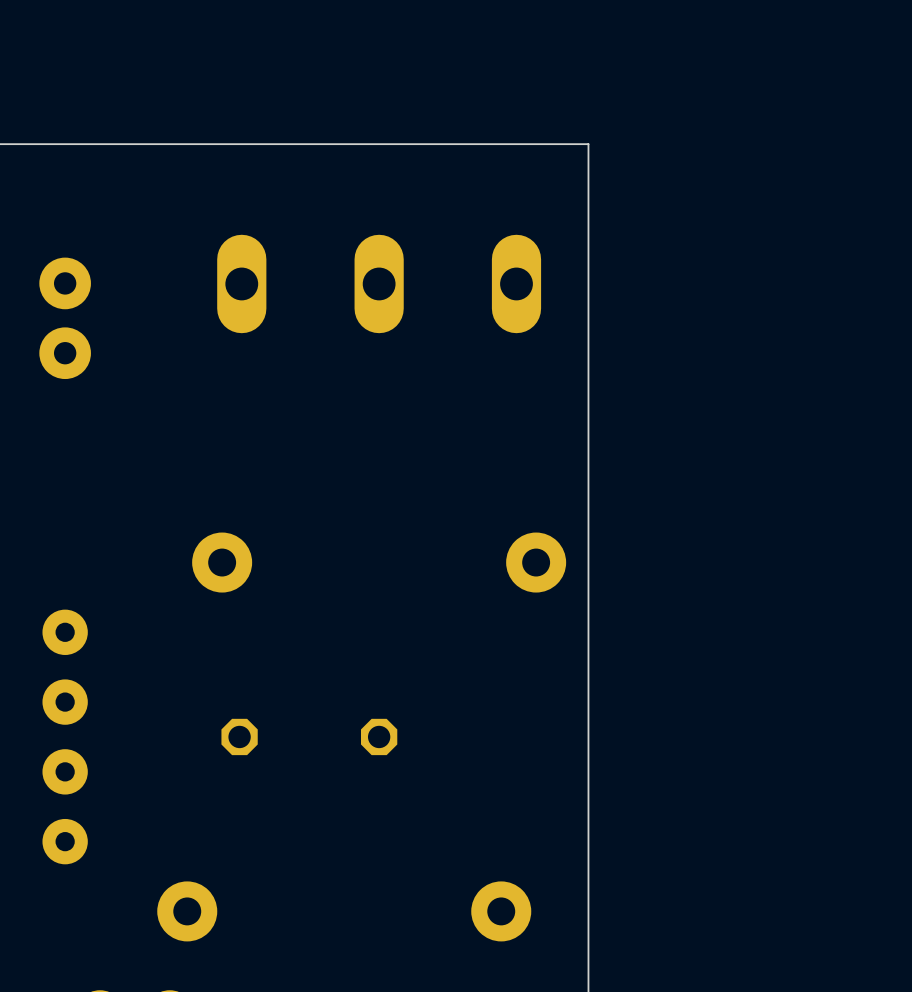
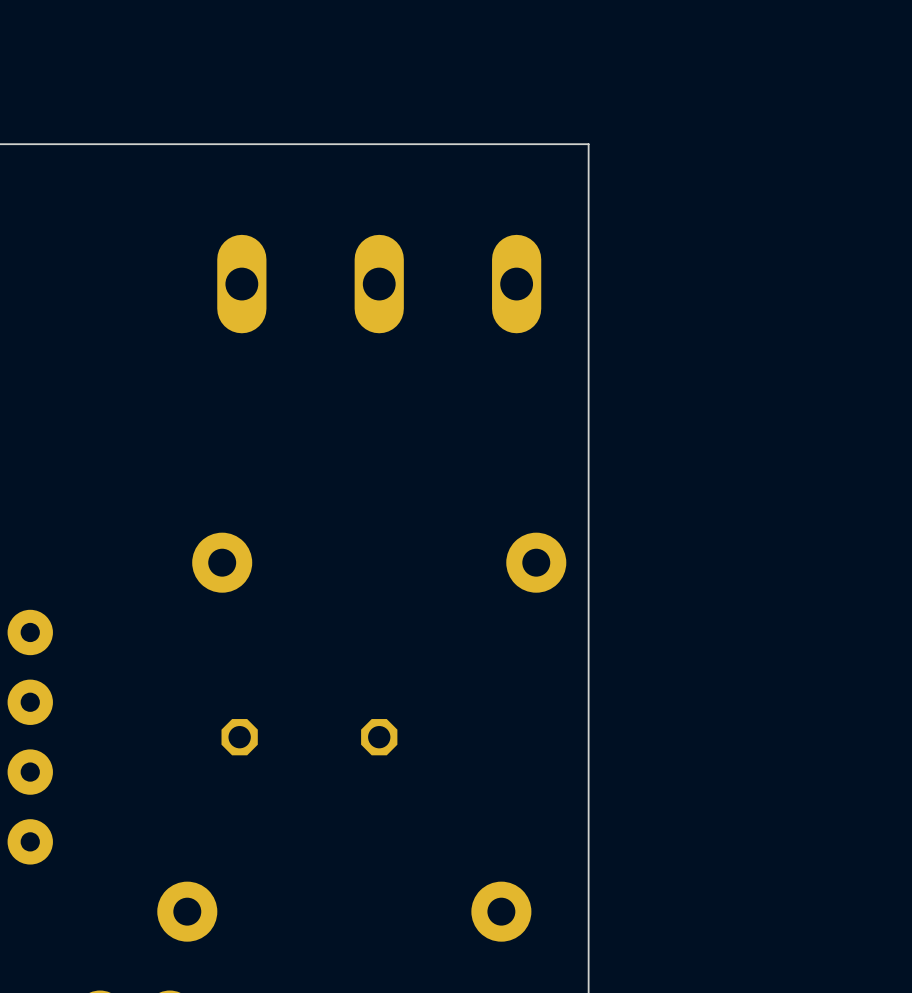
part: (65, 318) -> none
part position: (65, 667) -> (30, 667)
part position: (65, 806) -> (30, 806)

